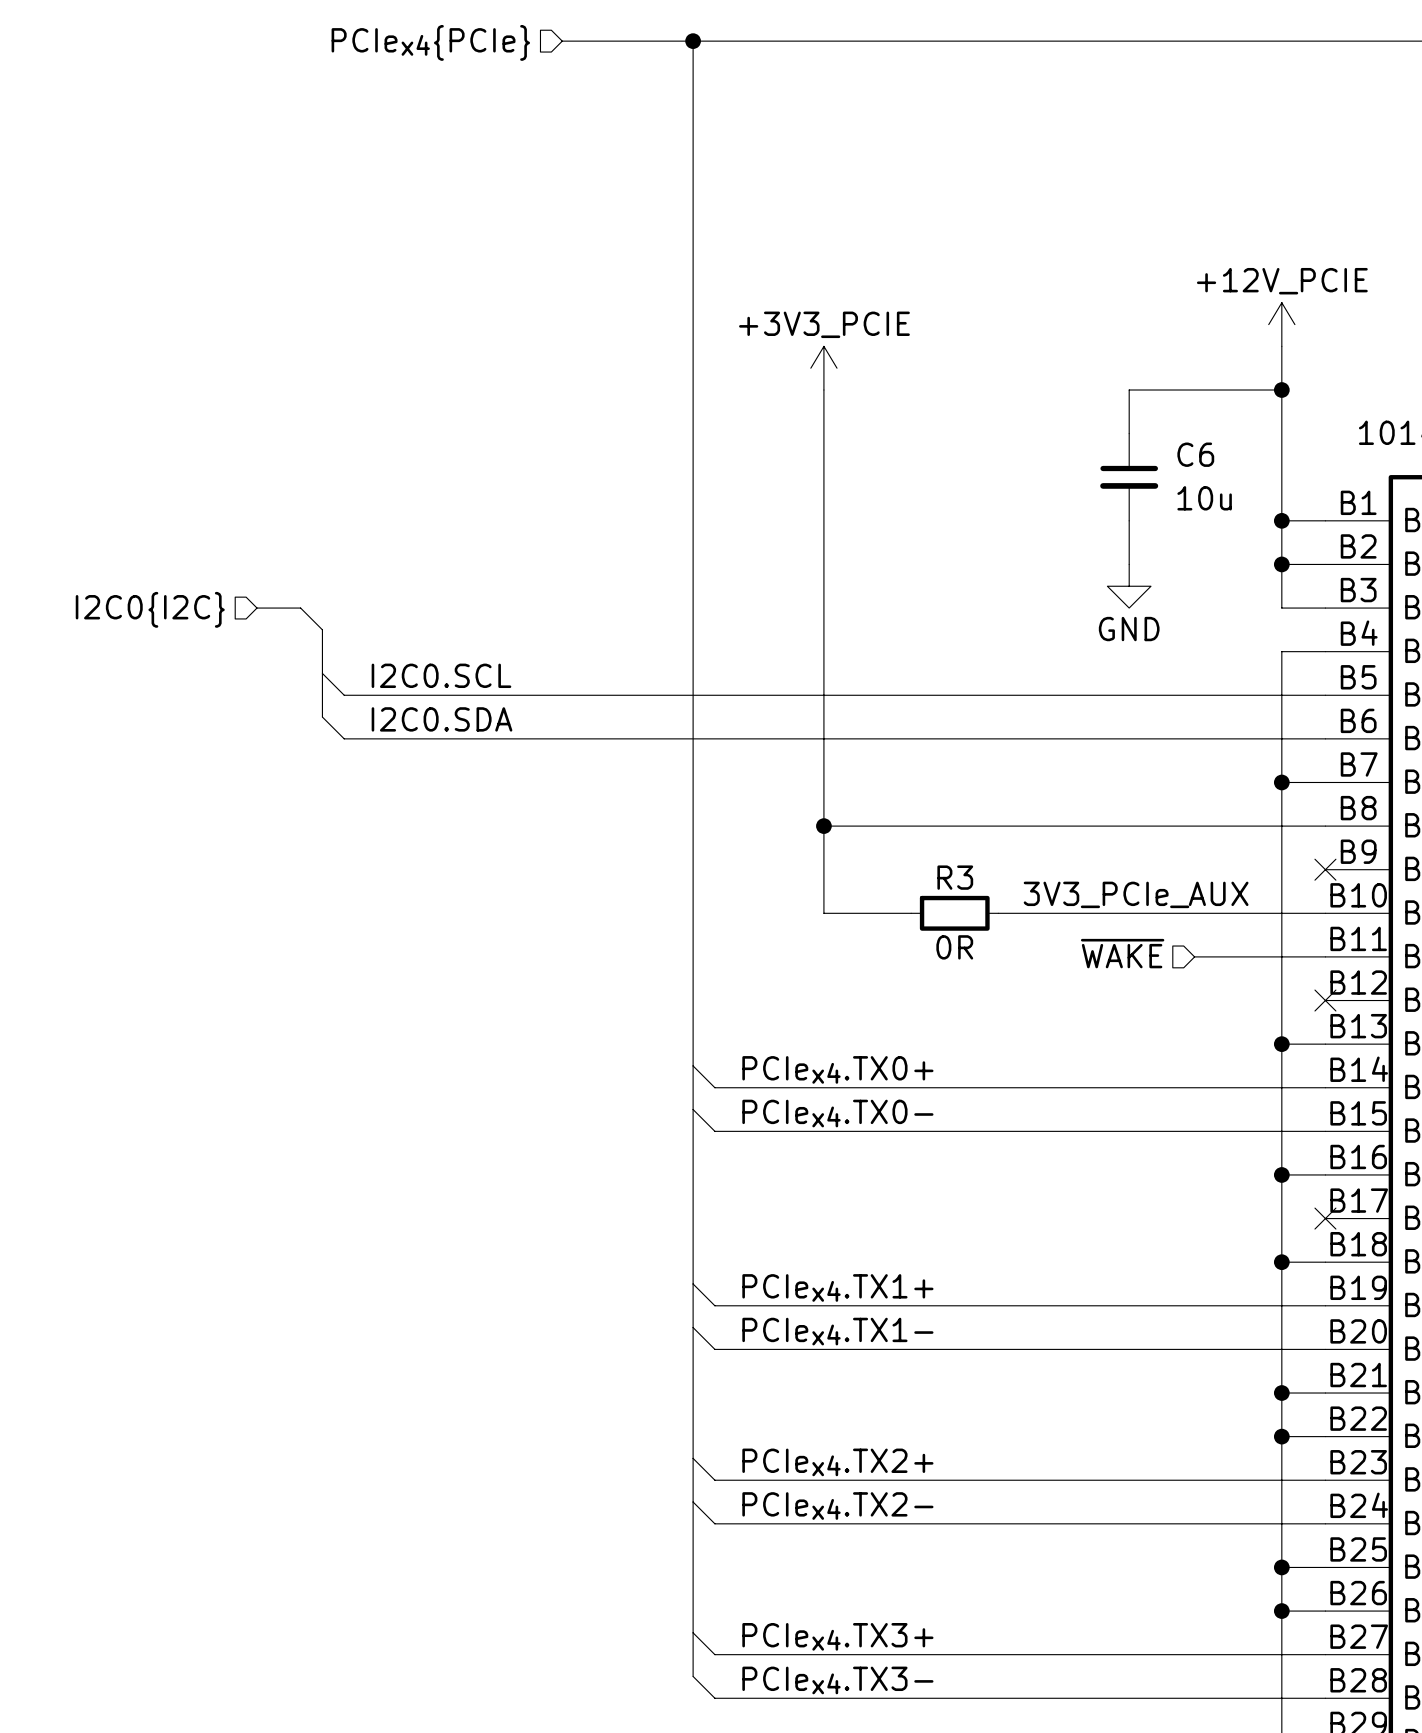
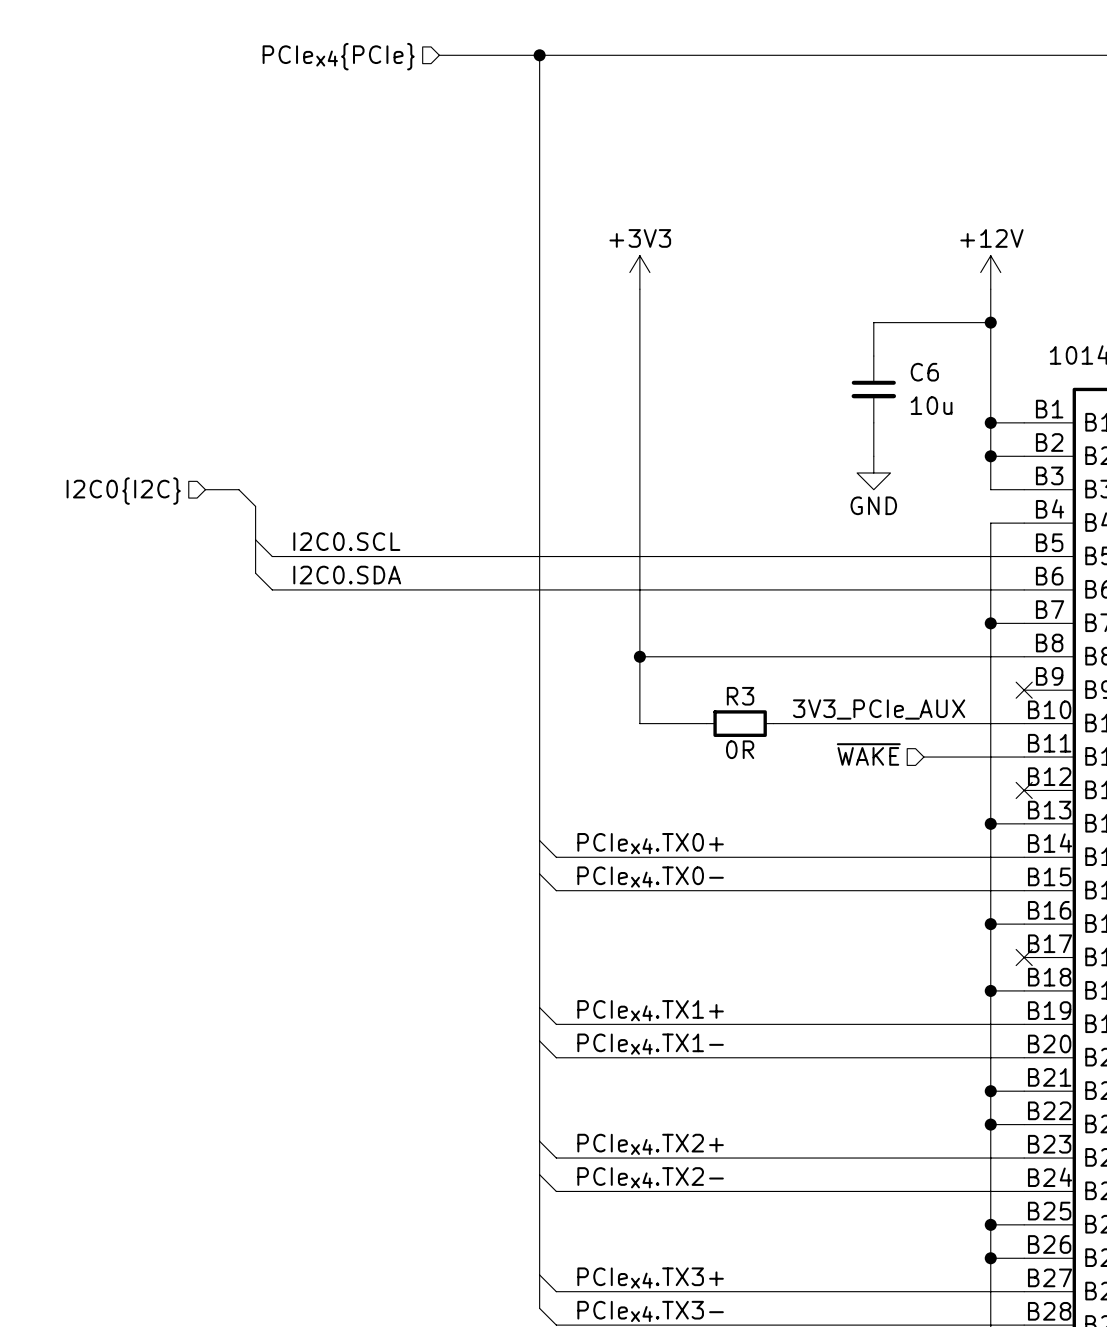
power symbol: none -> +3V3 (639, 272)
power symbol: +12V_PCIE (1281, 324) -> +12V (990, 272)
power symbol: +3V3_PCIE (823, 368) -> none

